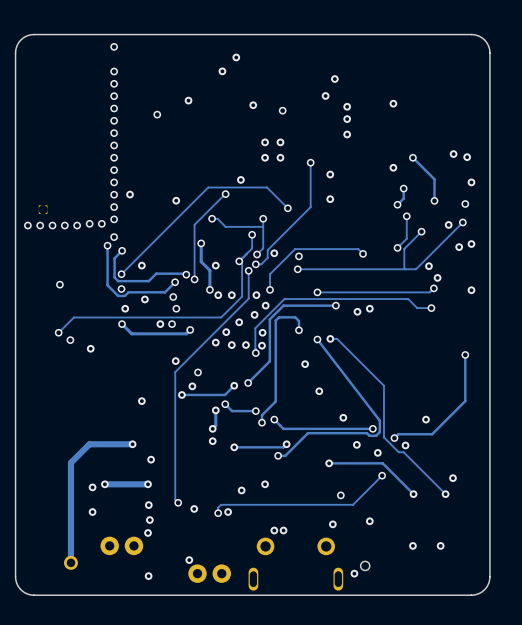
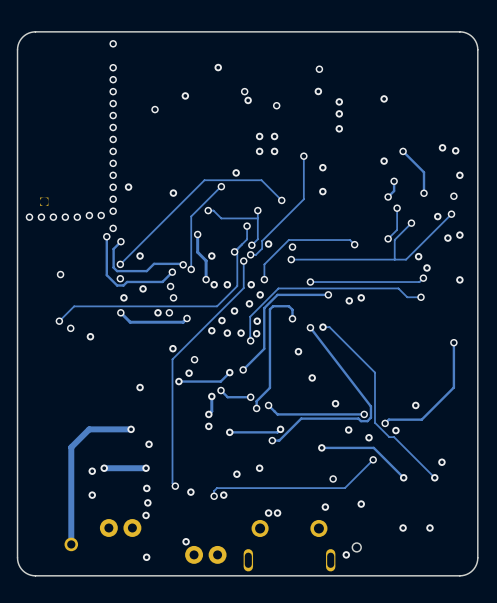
via: (236, 57) -> none
via: none -> (319, 69)
via: (334, 79) -> none
via: none -> (244, 91)

